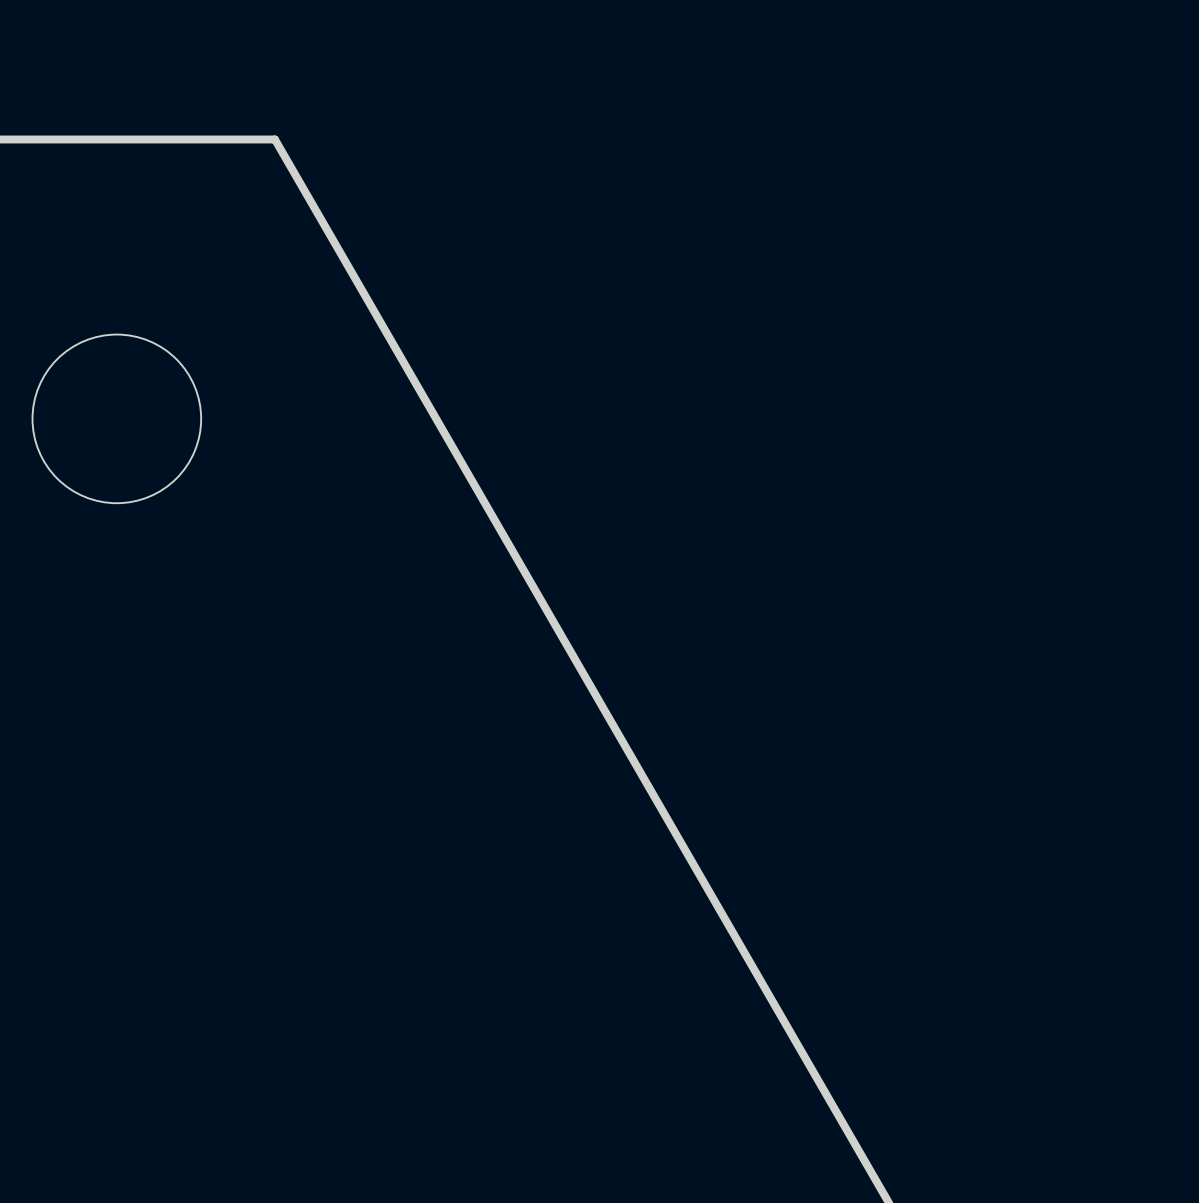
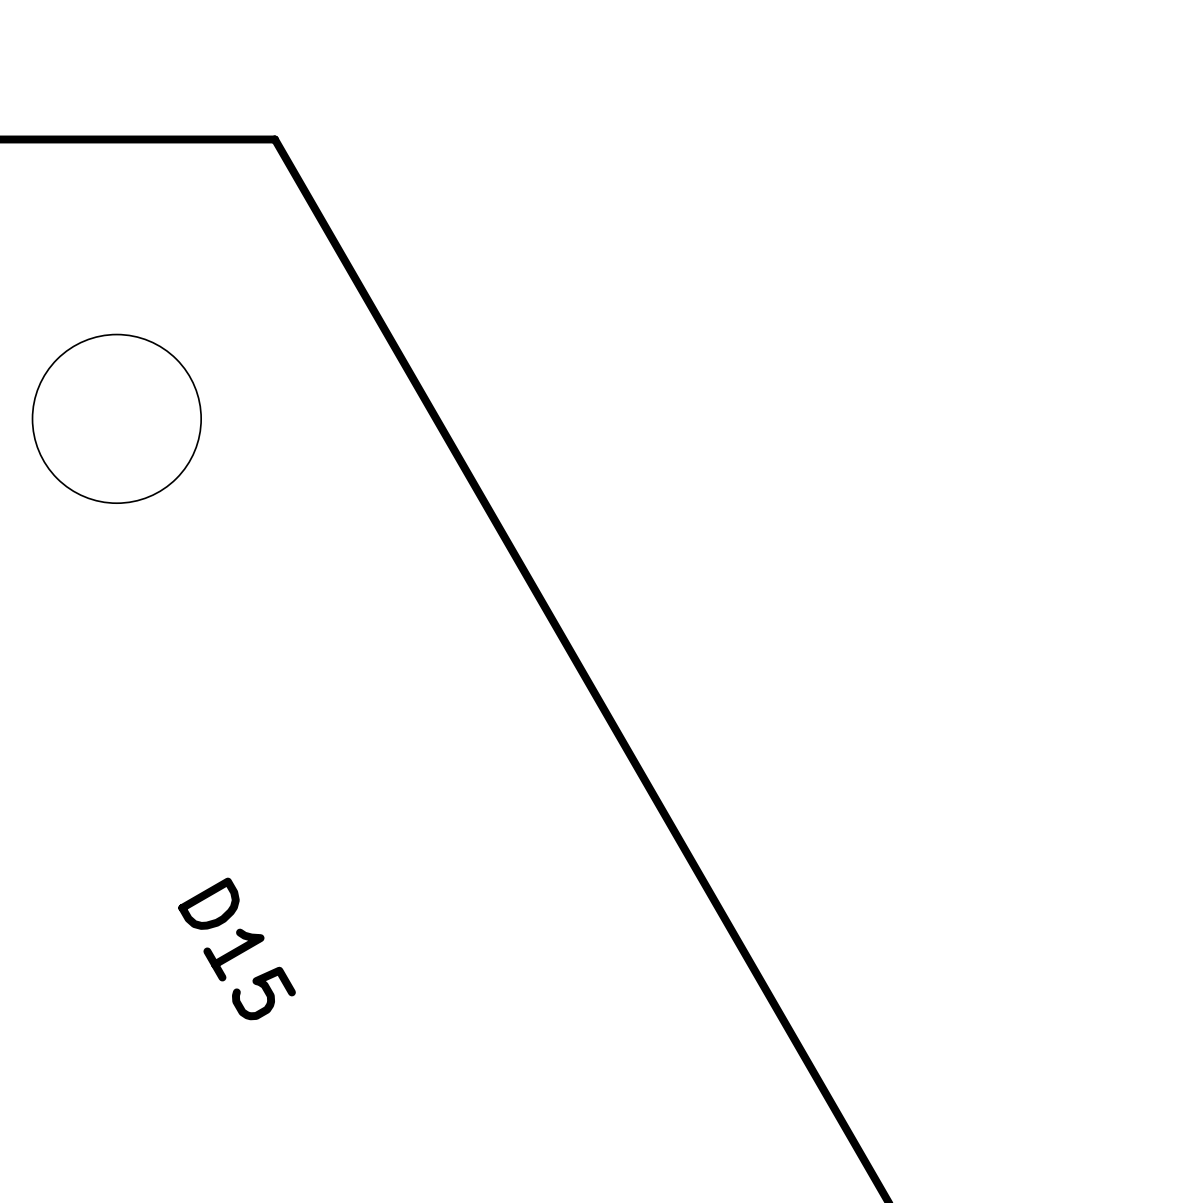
D15: none -> (237, 948)

